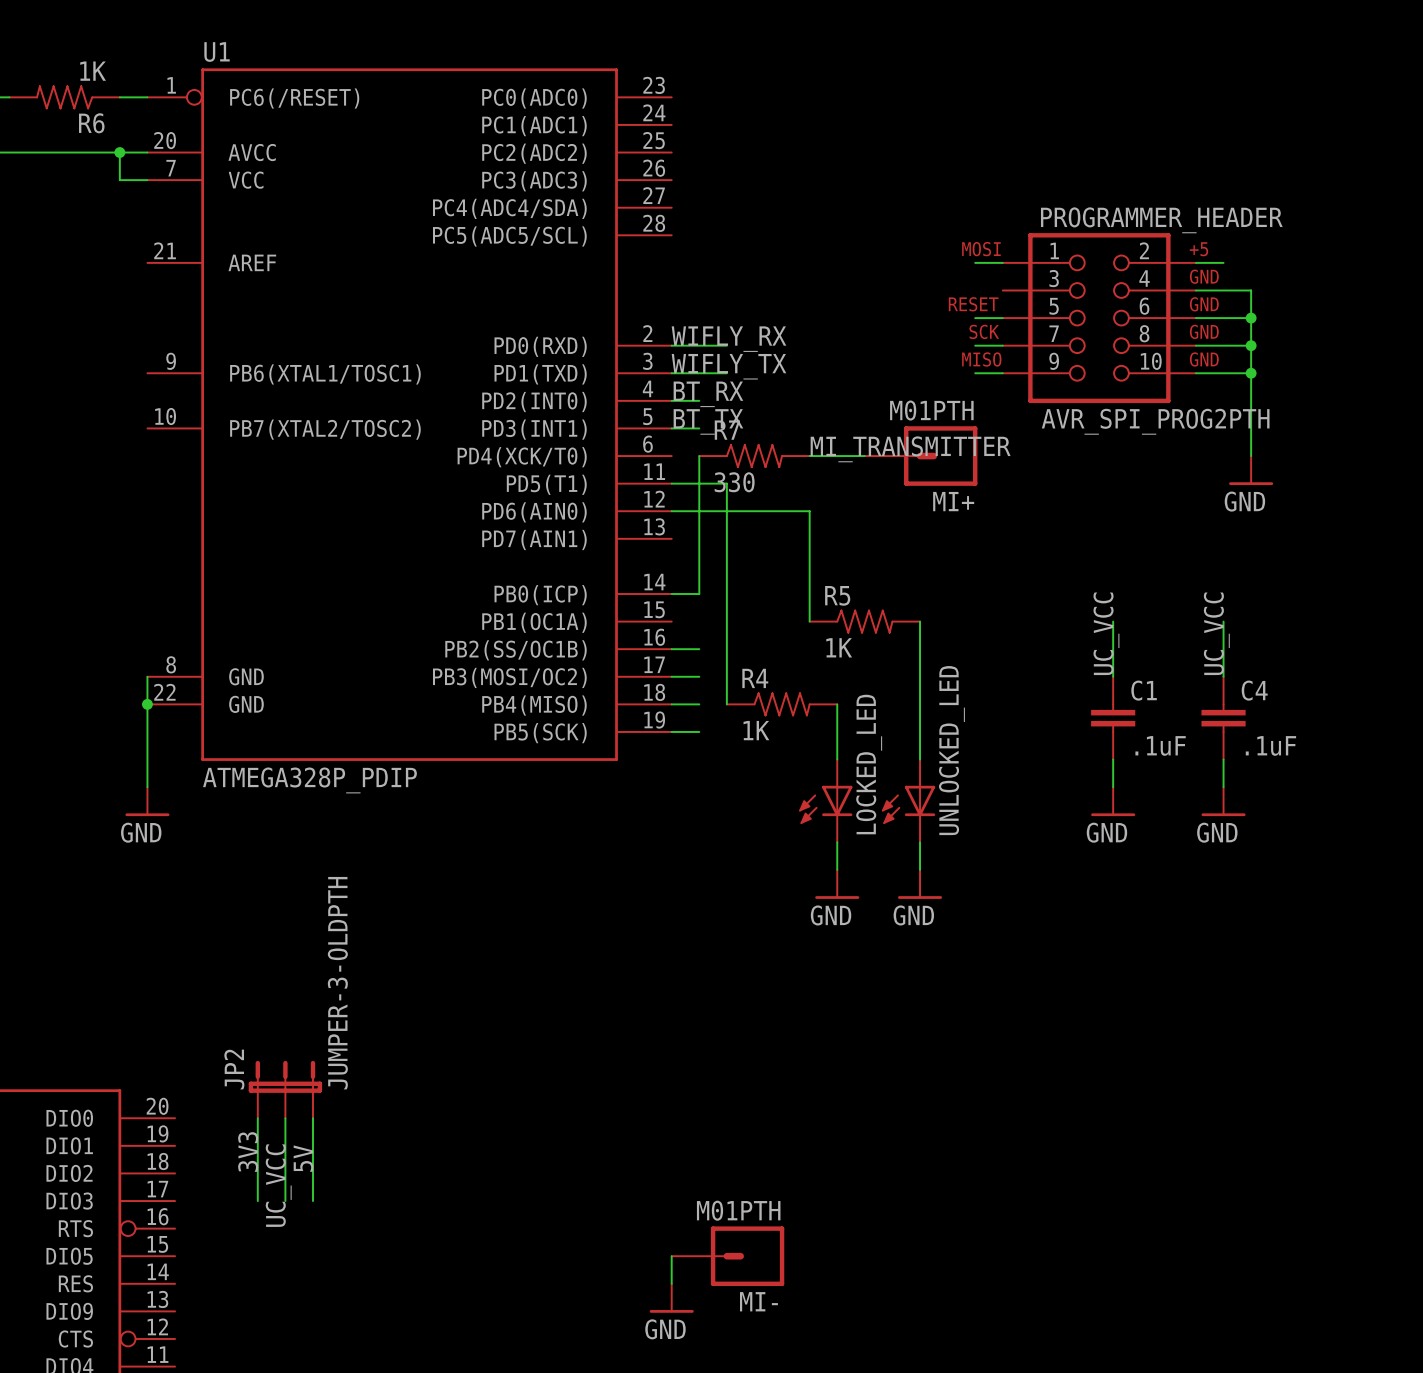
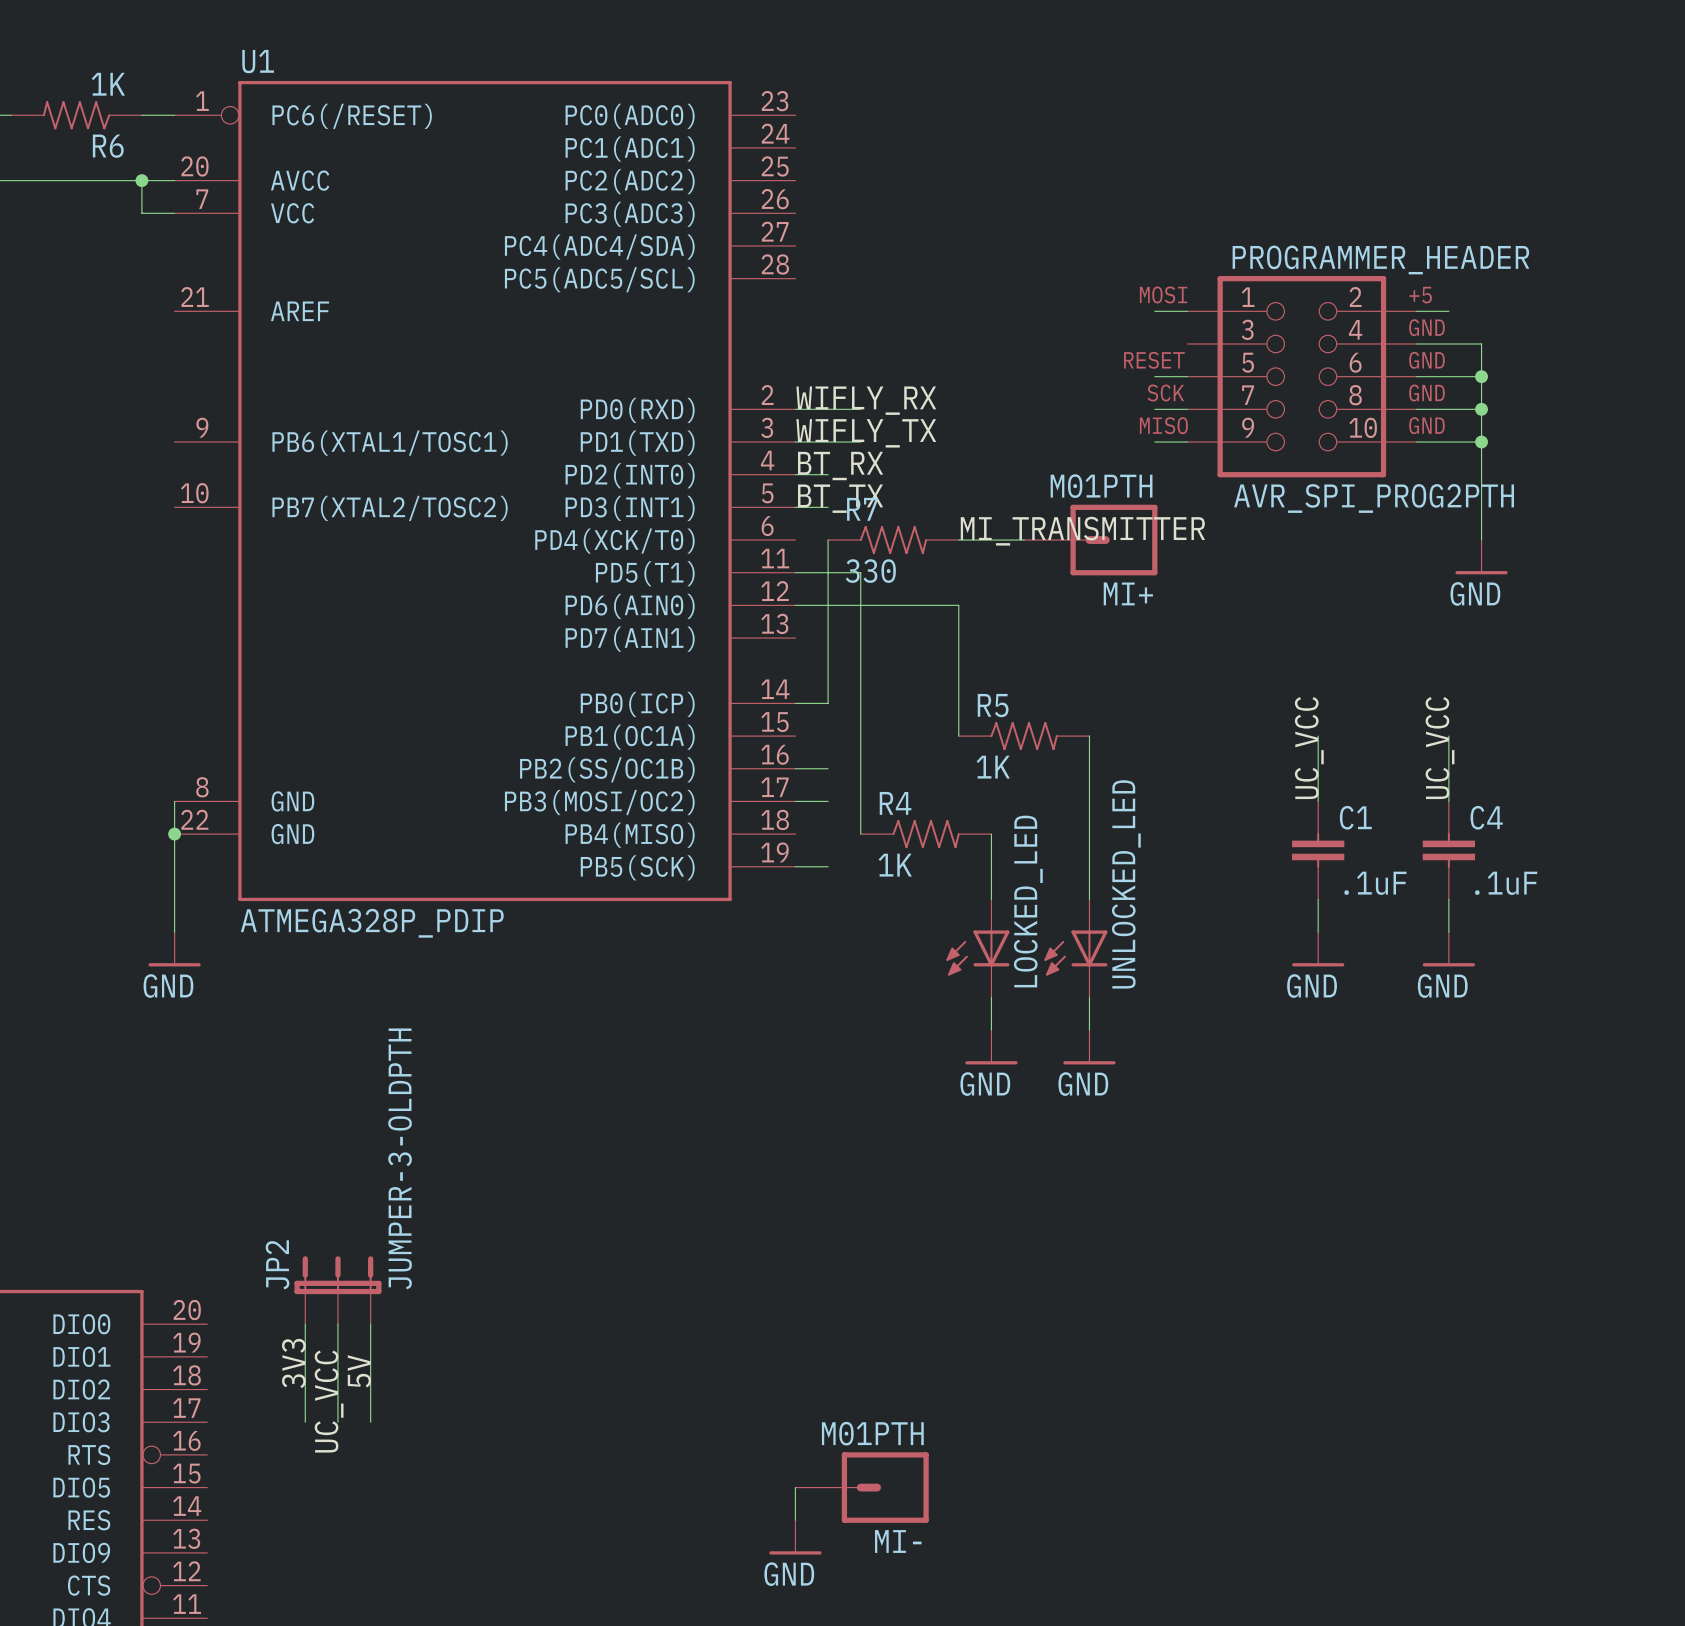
wire: (671, 704) (699, 704) -> none

